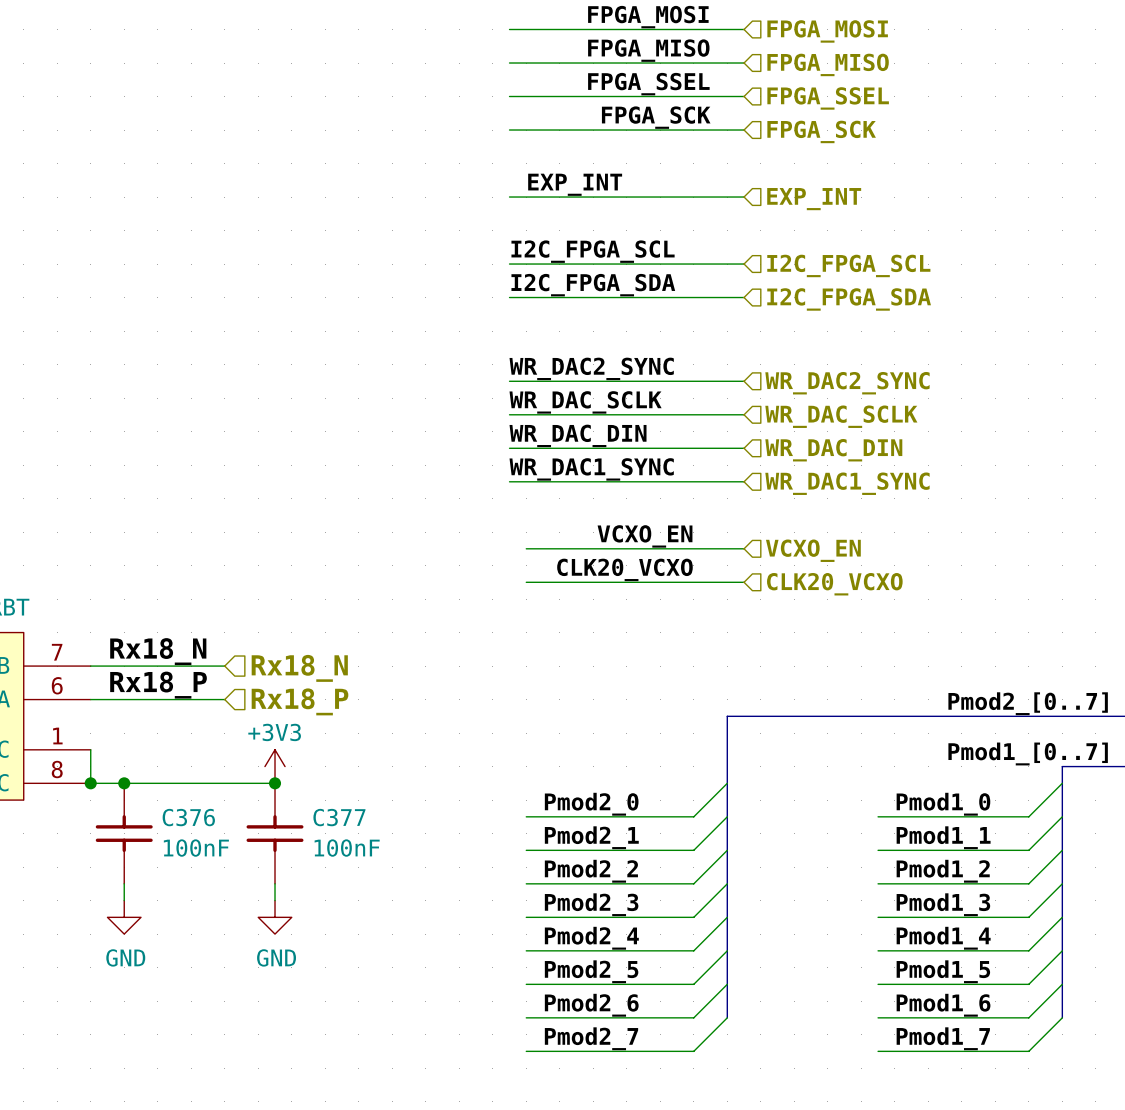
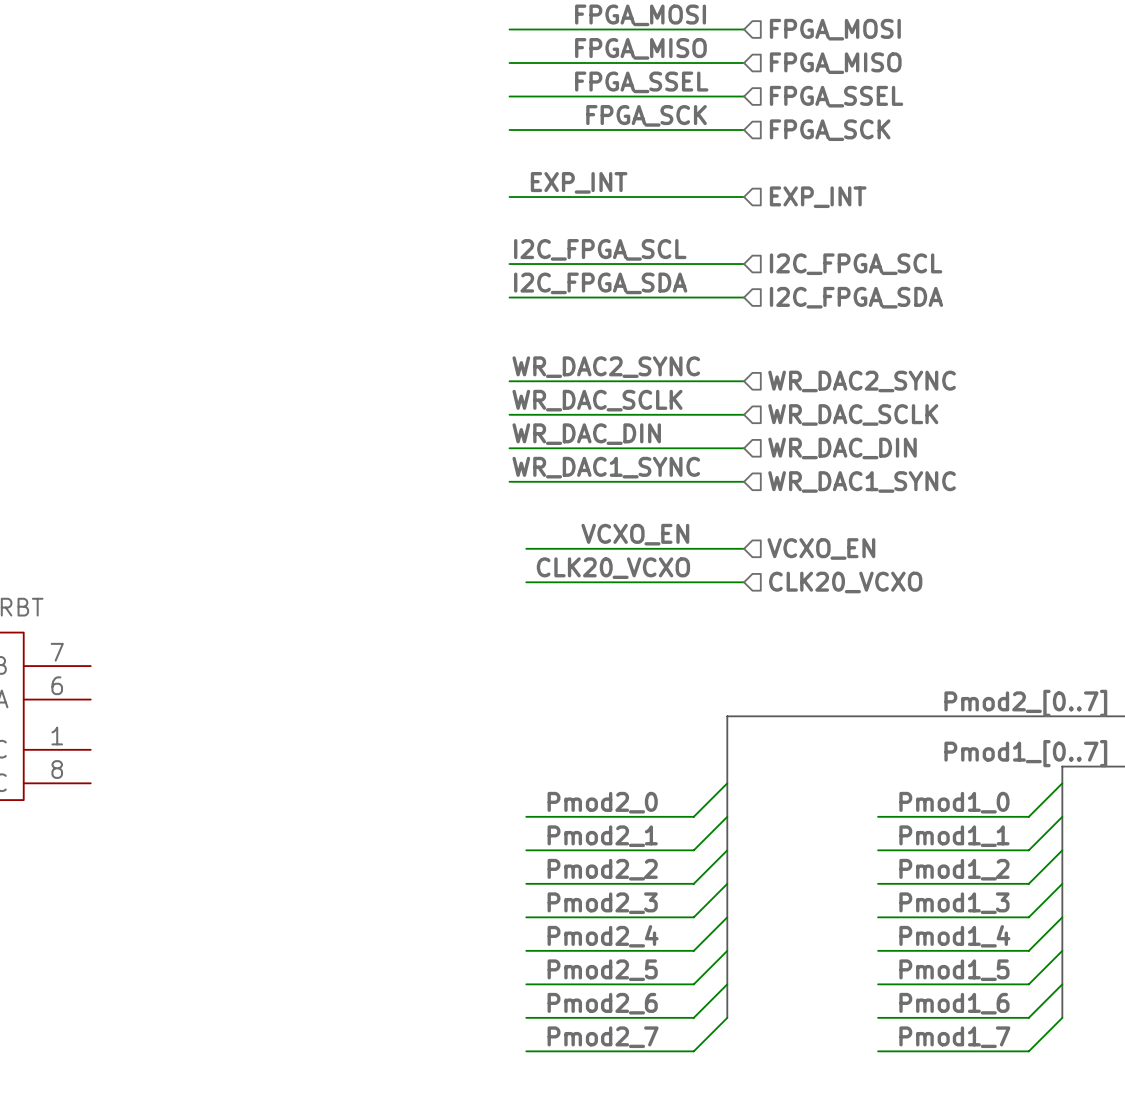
label: Rx18_N (158, 651) -> none
wire: (90, 666) (224, 666) -> none
hierarchical label: Rx18_N (299, 668) -> none
label: Rx18_P (158, 685) -> none
wire: (90, 699) (224, 699) -> none
hierarchical label: Rx18_P (299, 701) -> none
wire: (90, 749) (90, 783) (275, 783) -> none
power symbol: +3V3 (275, 766) -> none
junction: (90, 783) -> none
junction: (124, 783) -> none
junction: (275, 783) -> none
C376: (124, 833) -> none
C377: (275, 833) -> none
wire: (124, 883) (124, 900) -> none
wire: (275, 883) (275, 900) -> none
power symbol: GND (124, 917) -> none
power symbol: GND (275, 917) -> none

